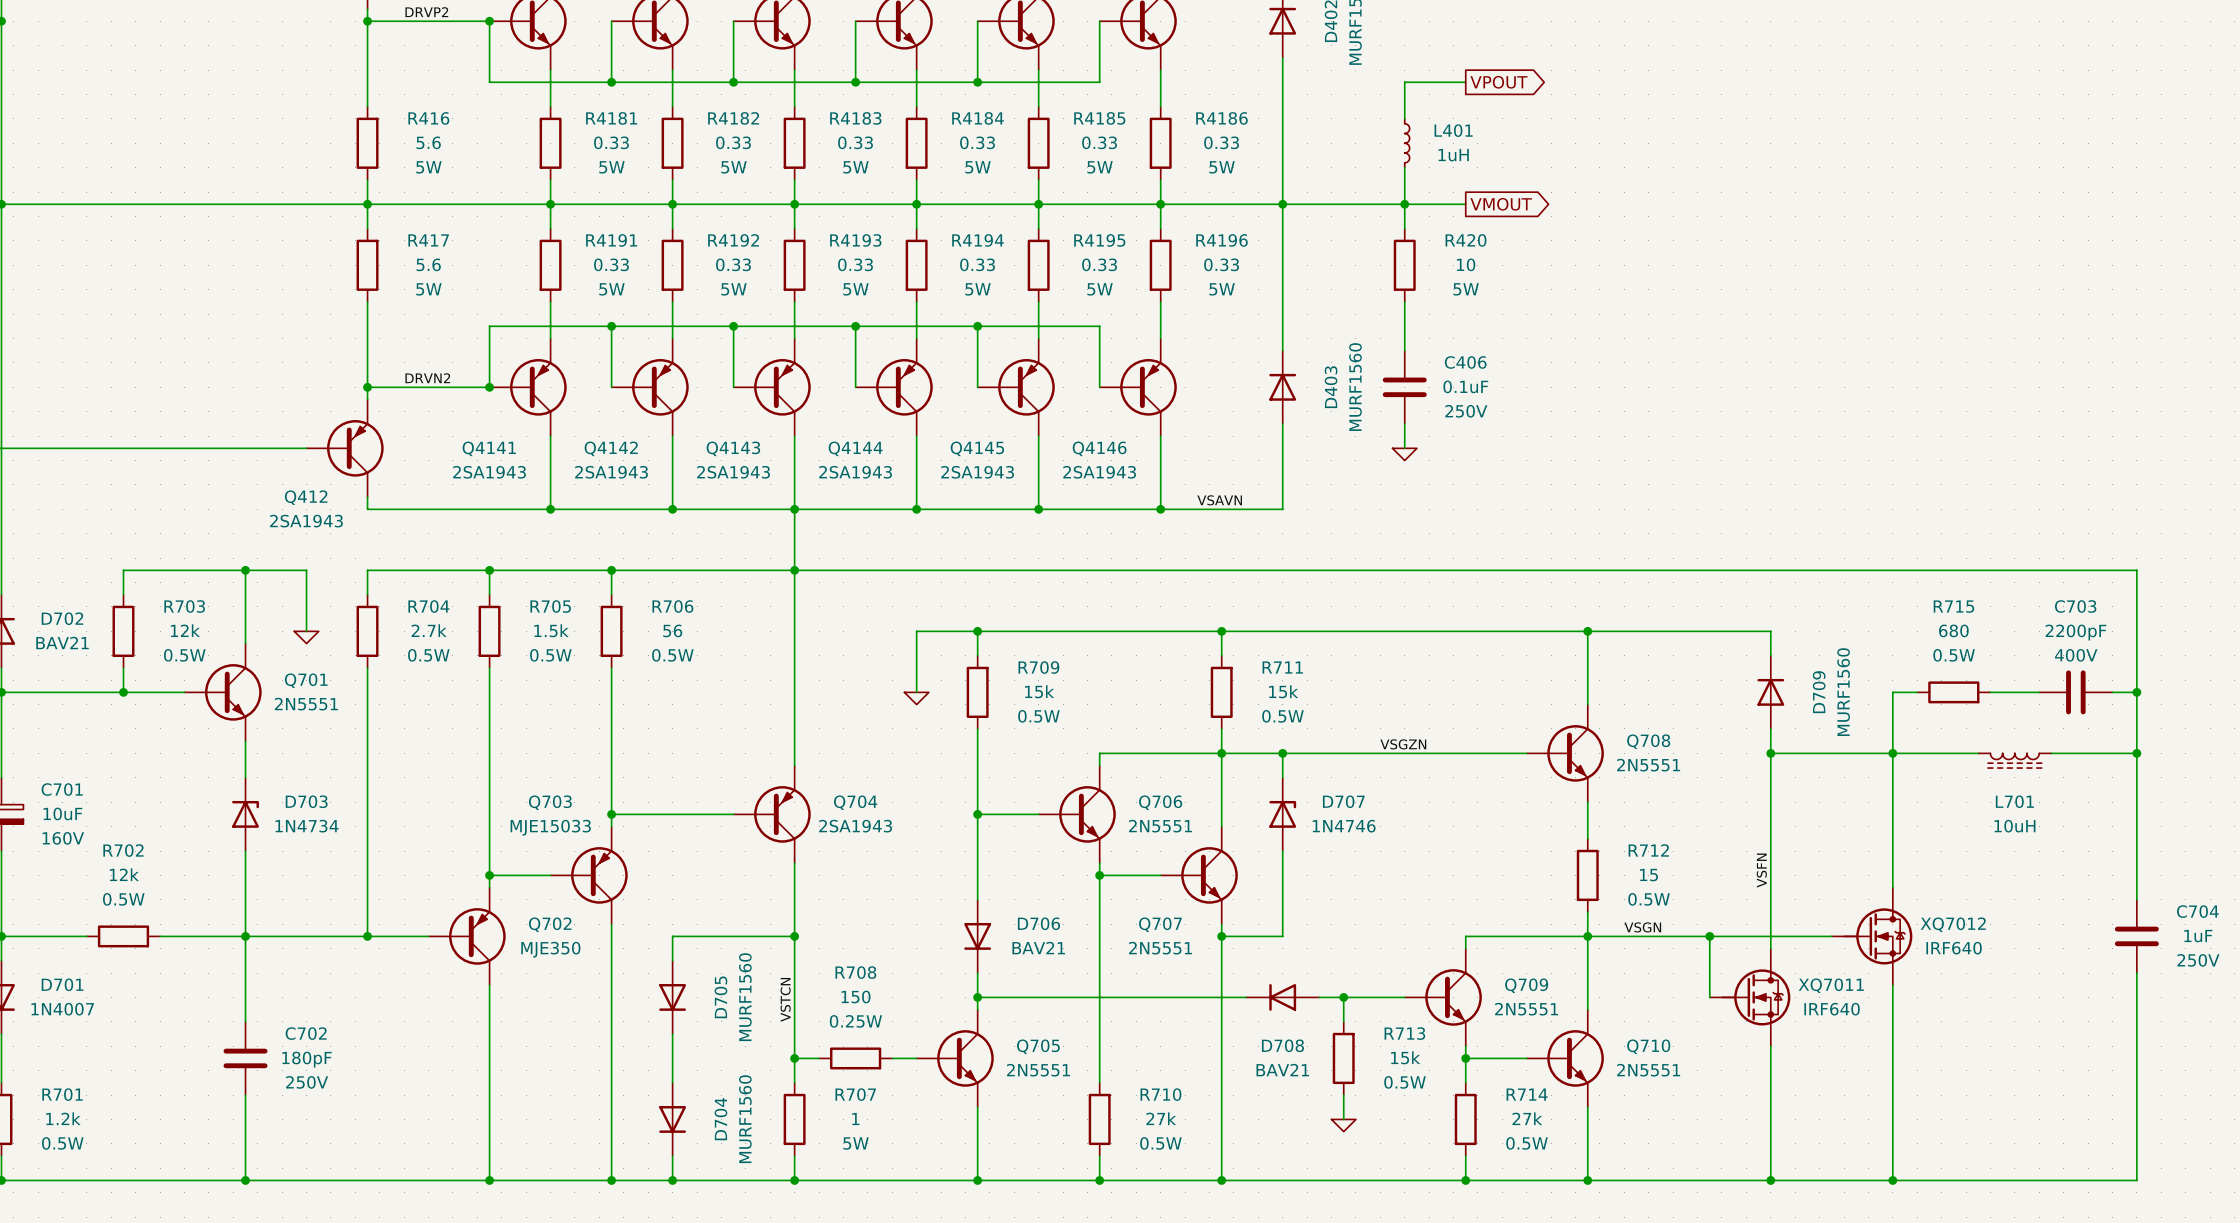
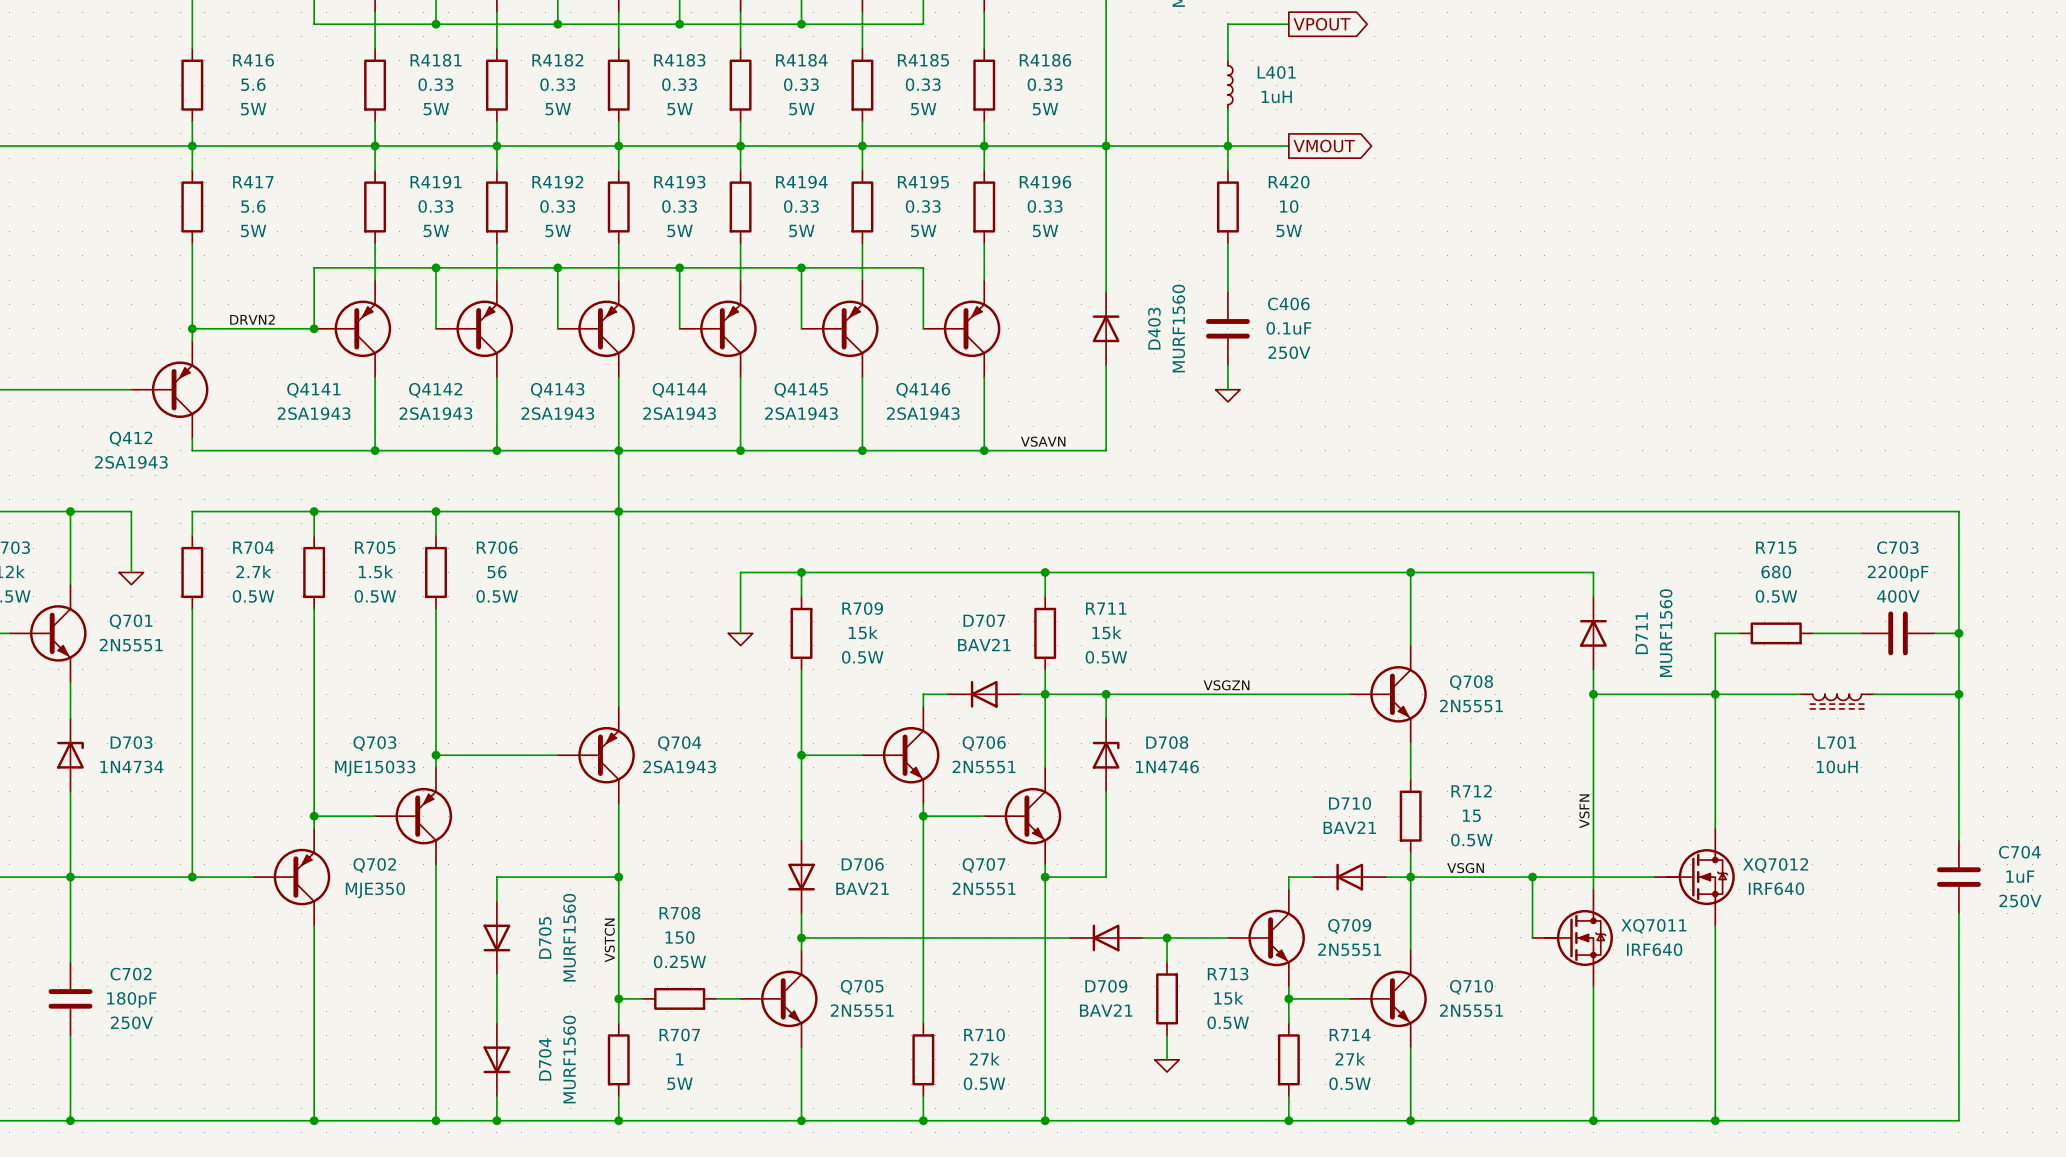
D709 name: D709 (1819, 692) -> D711 (1641, 633)
D707: none -> BAV21 (984, 694)
D707 name: D707 (1343, 801) -> D708 (1167, 742)
D710: none -> BAV21 (1349, 877)
D708 name: D708 (1282, 1045) -> D709 (1106, 986)

